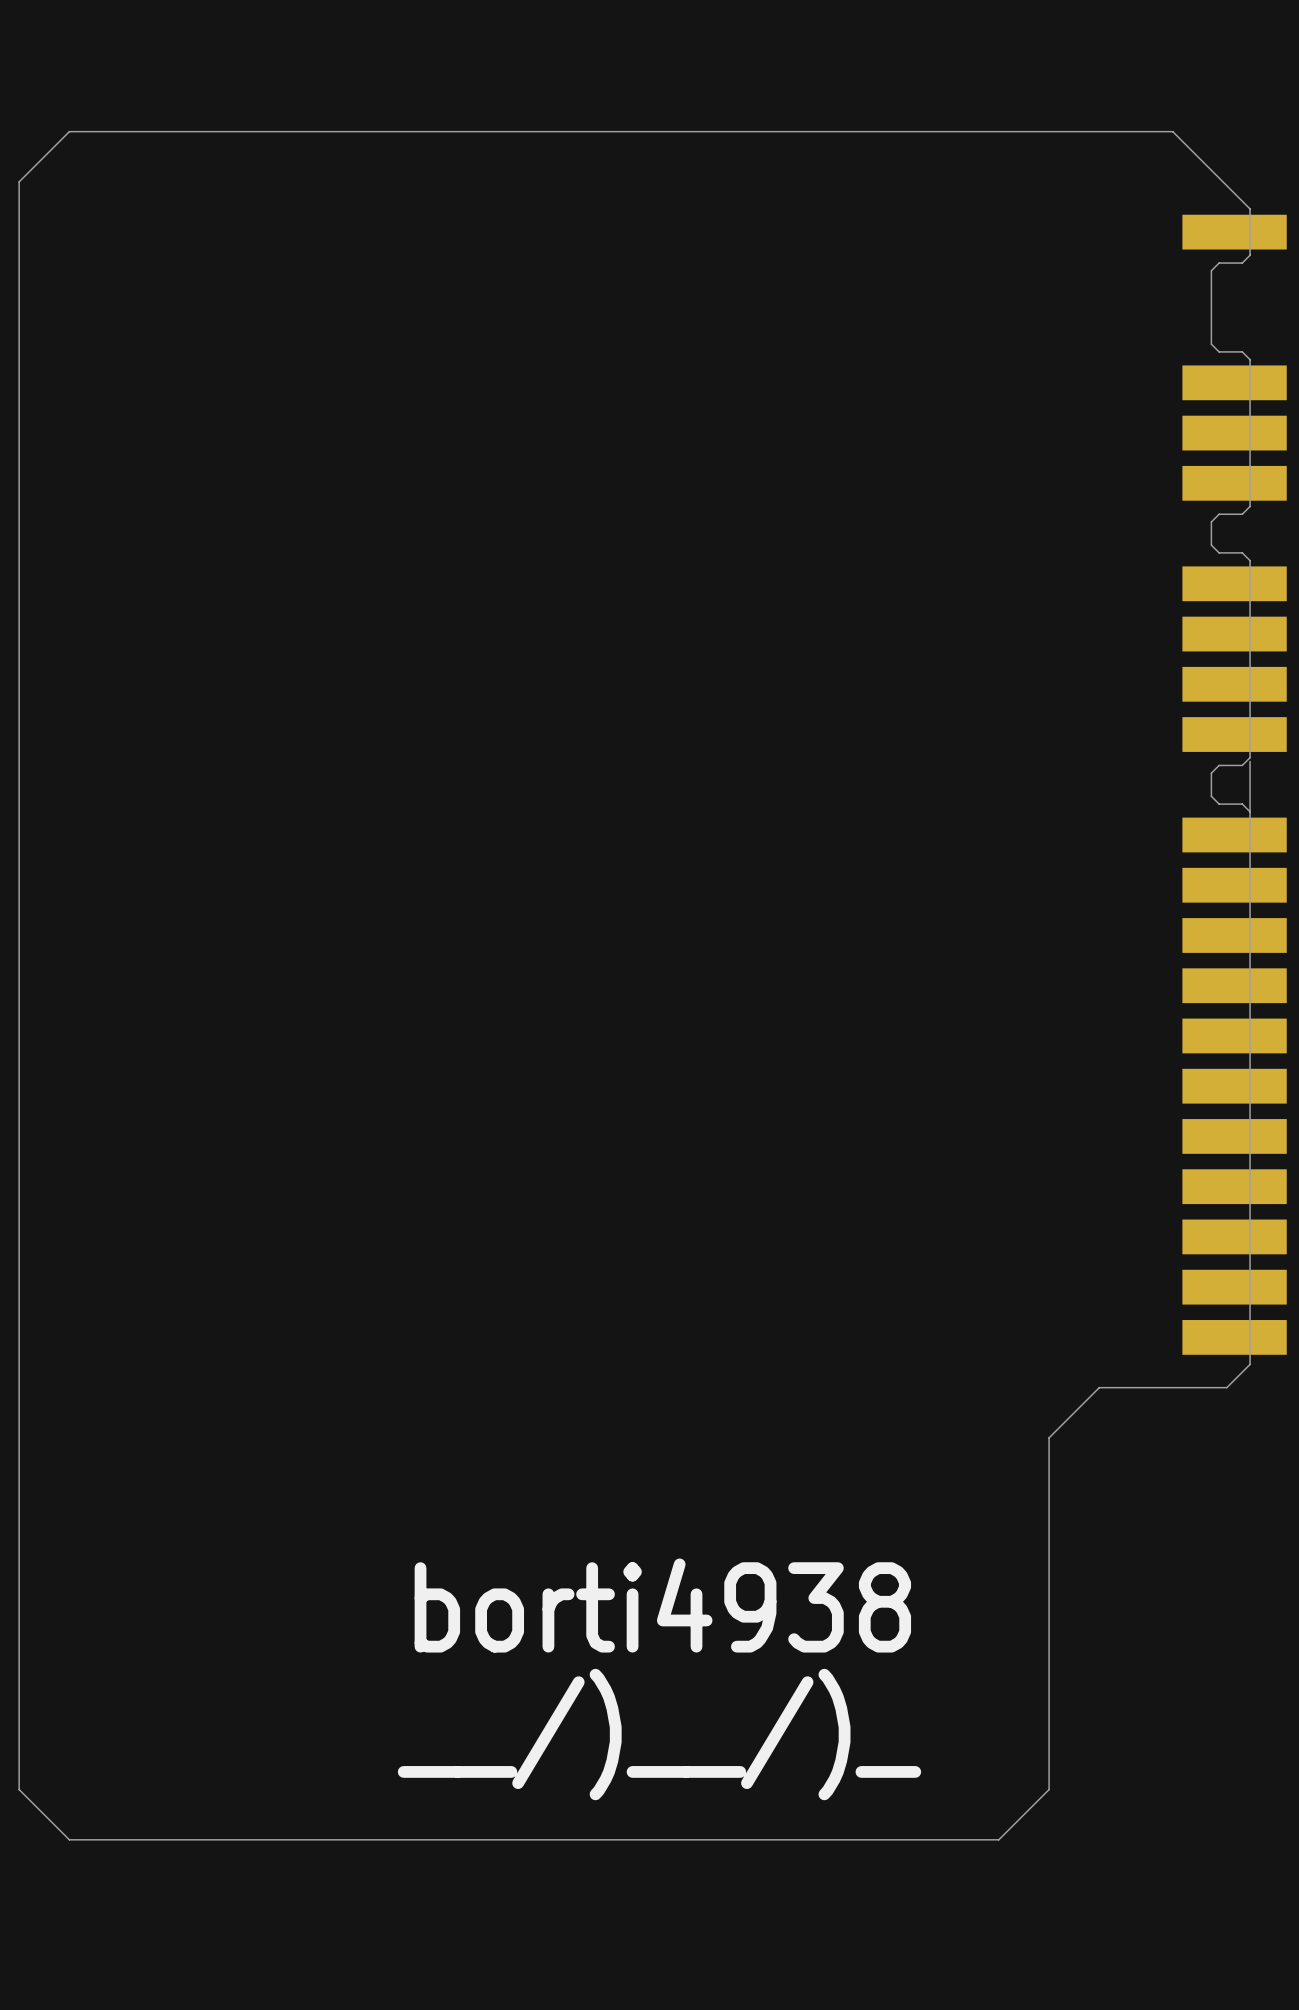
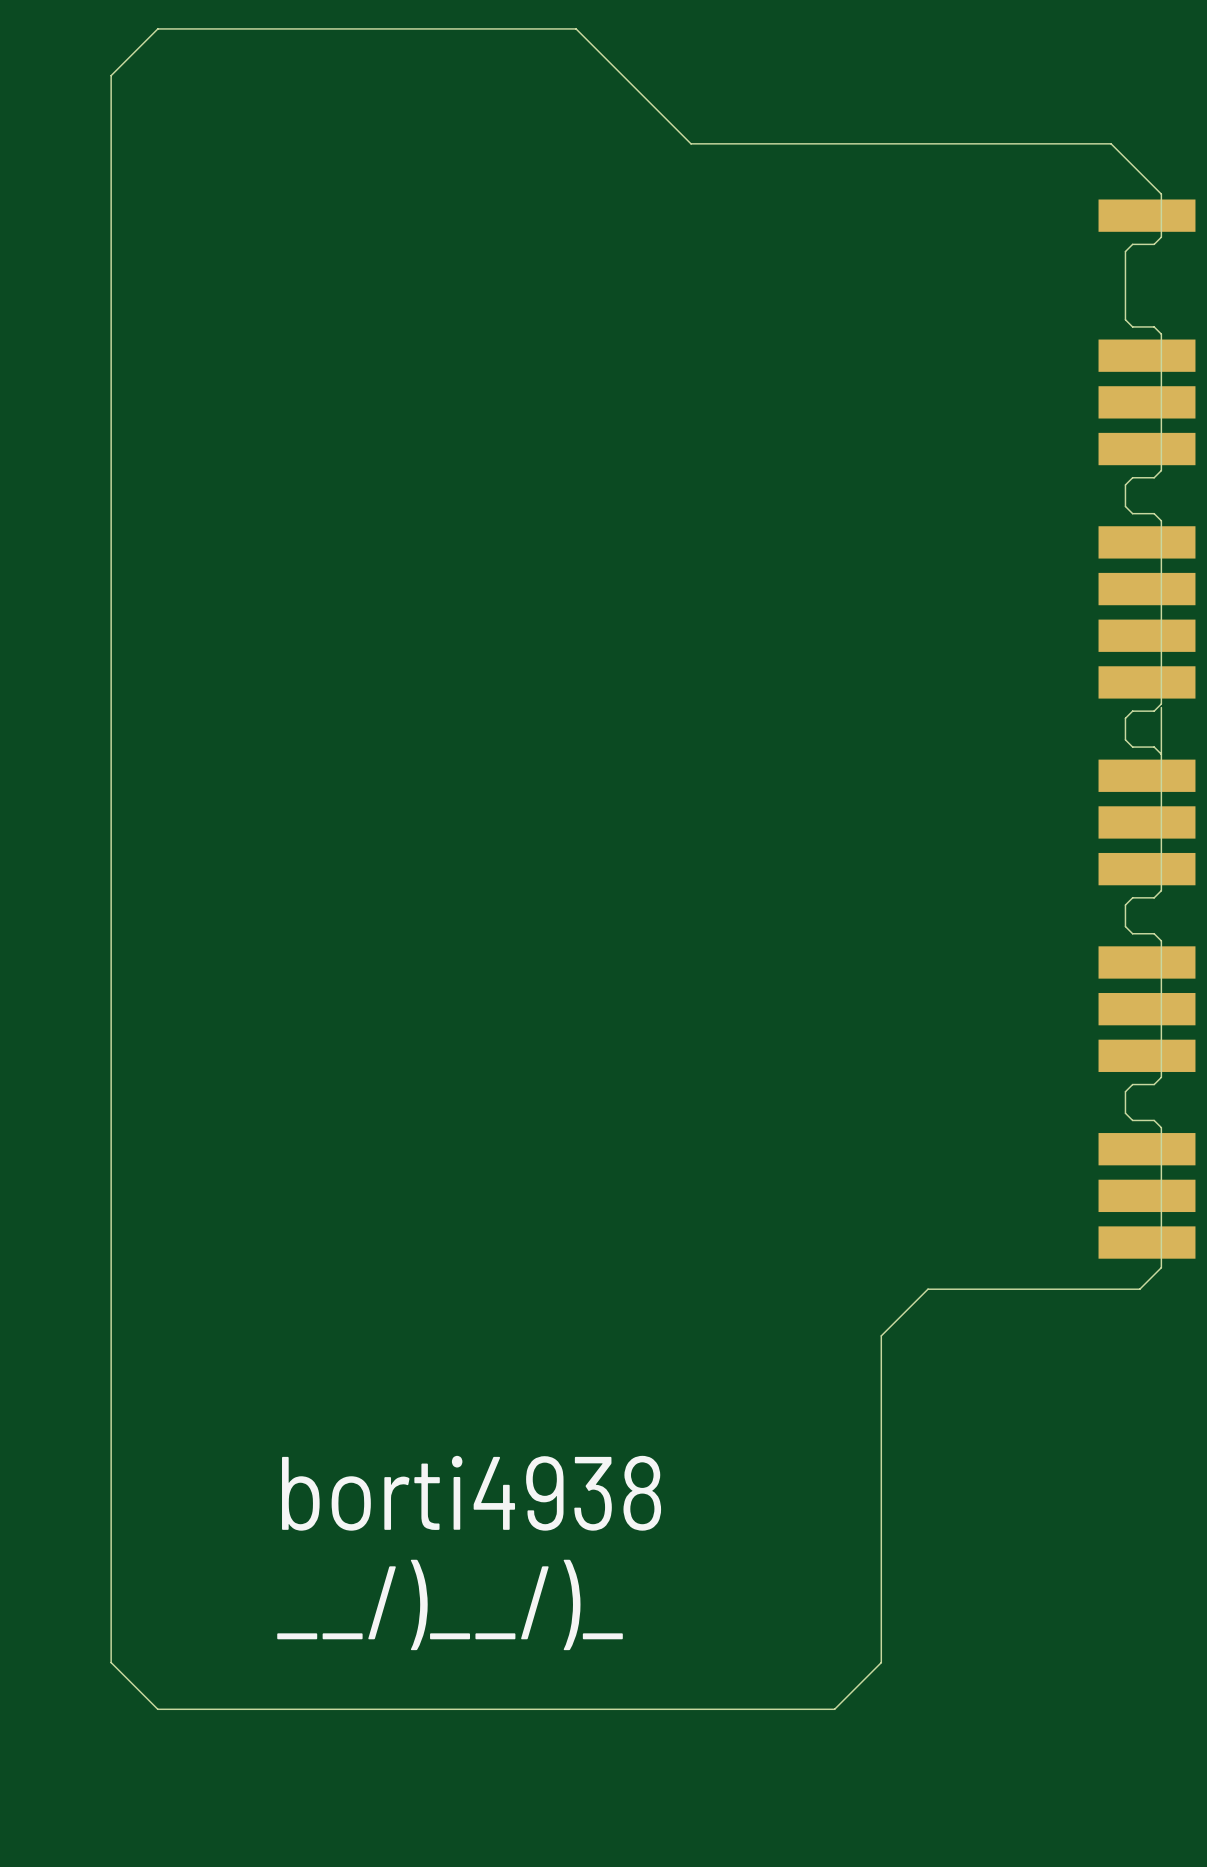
board edge: (1195, 154) (1172, 131) (69, 131) (19, 181) (19, 1789) (69, 1839) (169, 1839) -> (1111, 143) (691, 143) (576, 28) (157, 28) (111, 75) (111, 1662) (157, 1709)
board edge: (1250, 958) (1250, 1012) -> (1161, 890) (1154, 897) (1132, 897) (1125, 905) (1125, 926) (1132, 933) (1154, 933) (1161, 940)
part: (1234, 985) -> none
board edge: (1250, 1159) (1250, 1213) -> (1161, 1077) (1154, 1084) (1132, 1084) (1125, 1091) (1125, 1113) (1132, 1120) (1154, 1120) (1161, 1127)
part: (1234, 1186) -> none
board edge: (1099, 1387) (1049, 1437) (1049, 1789) (998, 1839) (898, 1839) -> (1021, 1289) (927, 1289) (881, 1335) (881, 1662) (834, 1709)
text position: borti4938 (662, 1605) -> borti4938 (471, 1493)
text position: __/)__/)_ (659, 1734) -> __/)__/)_ (450, 1604)

